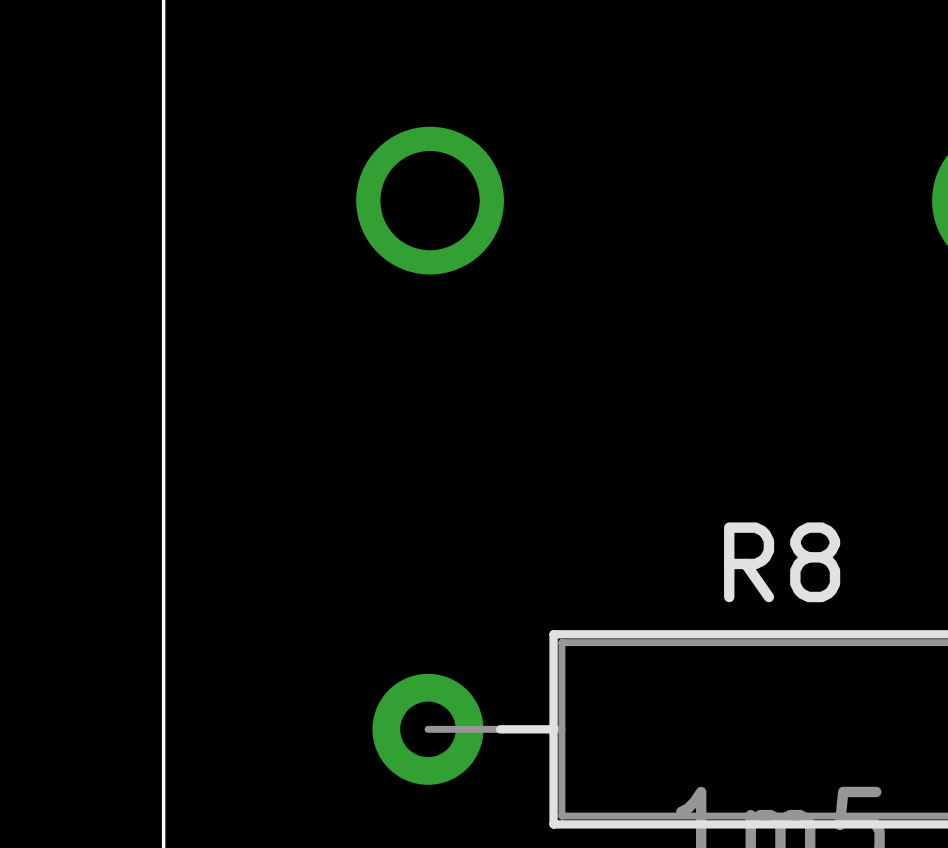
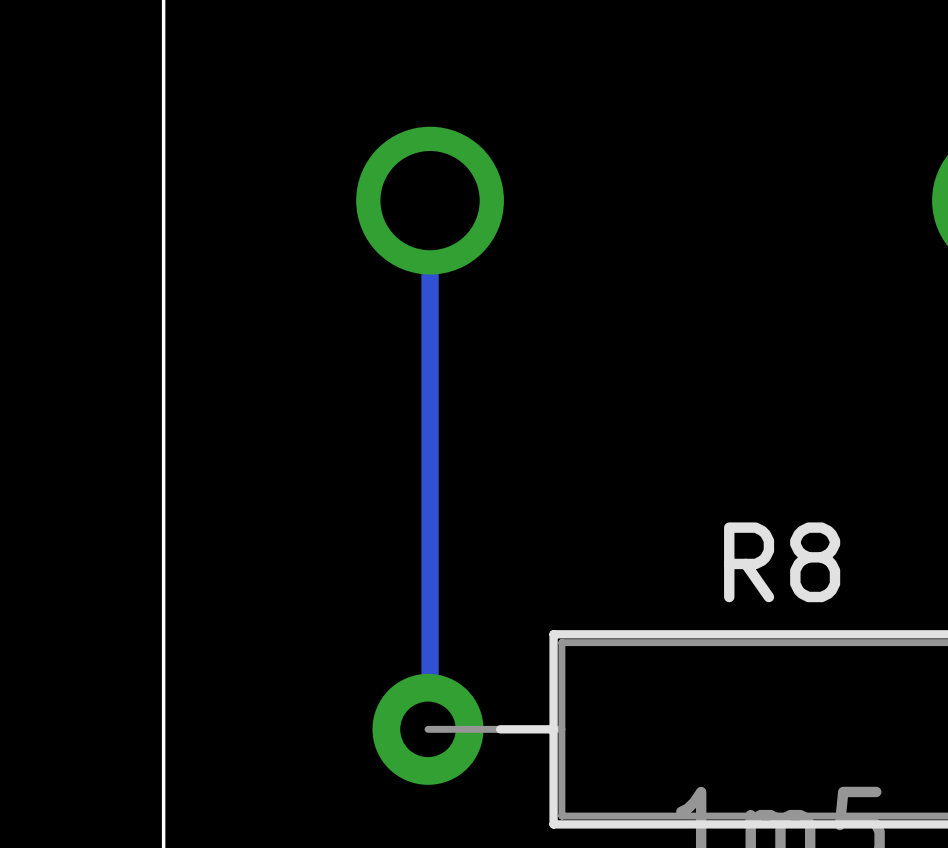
bottom track: none -> (430, 200) (430, 727) (427, 729)

